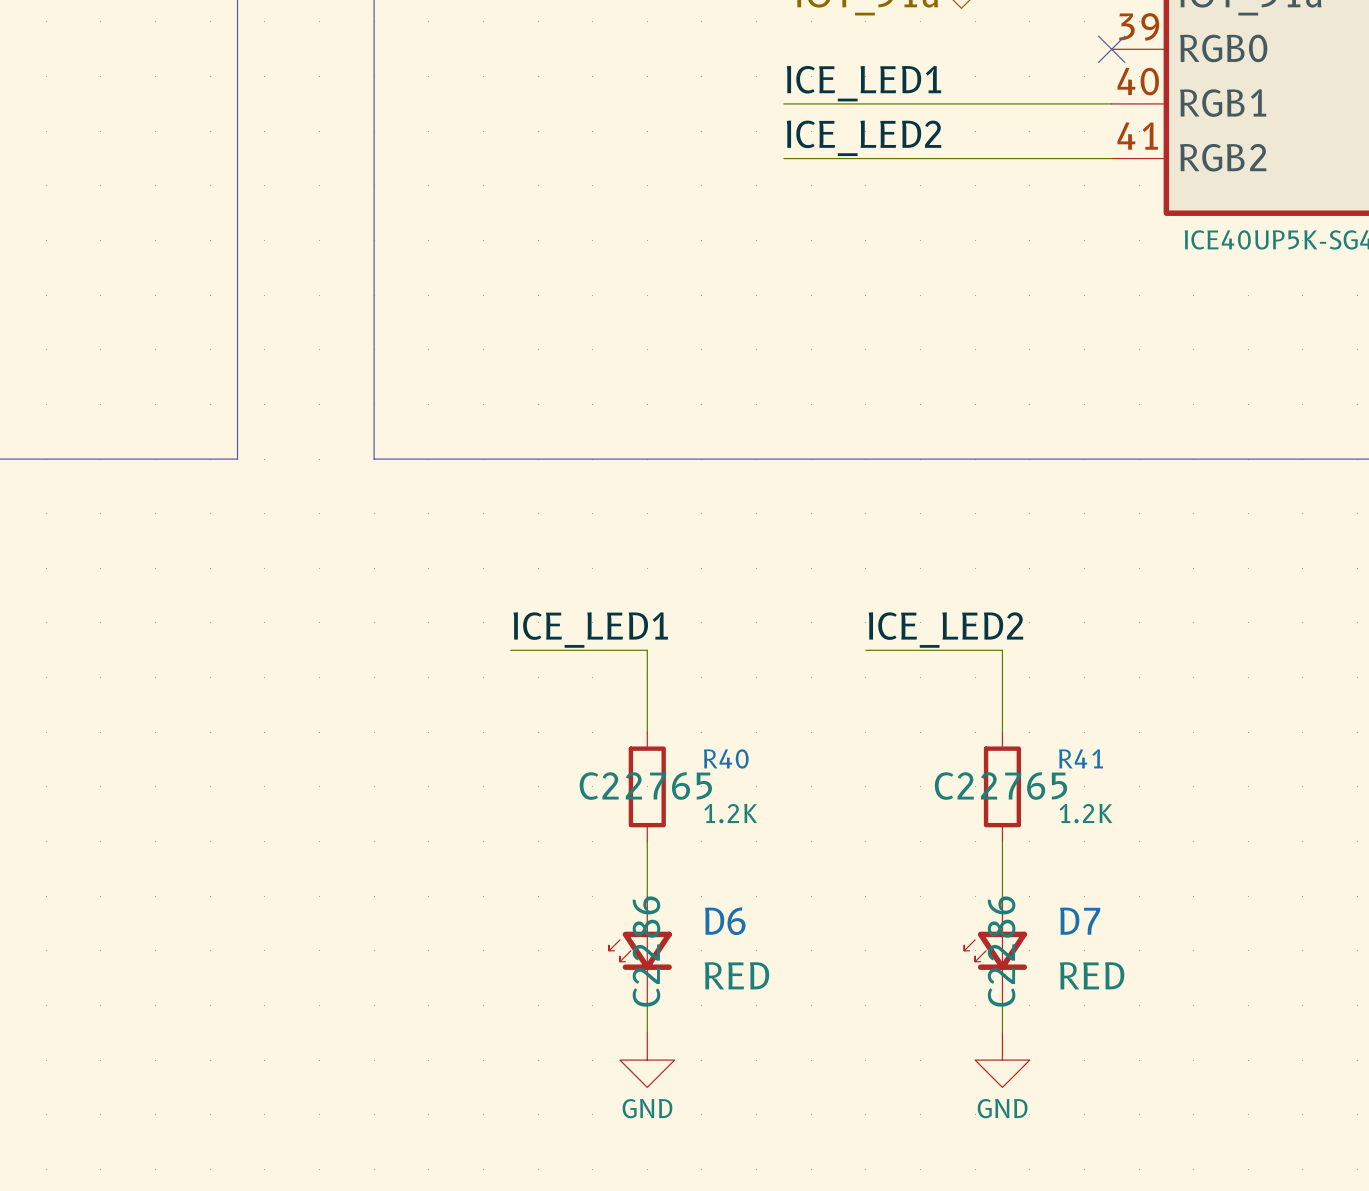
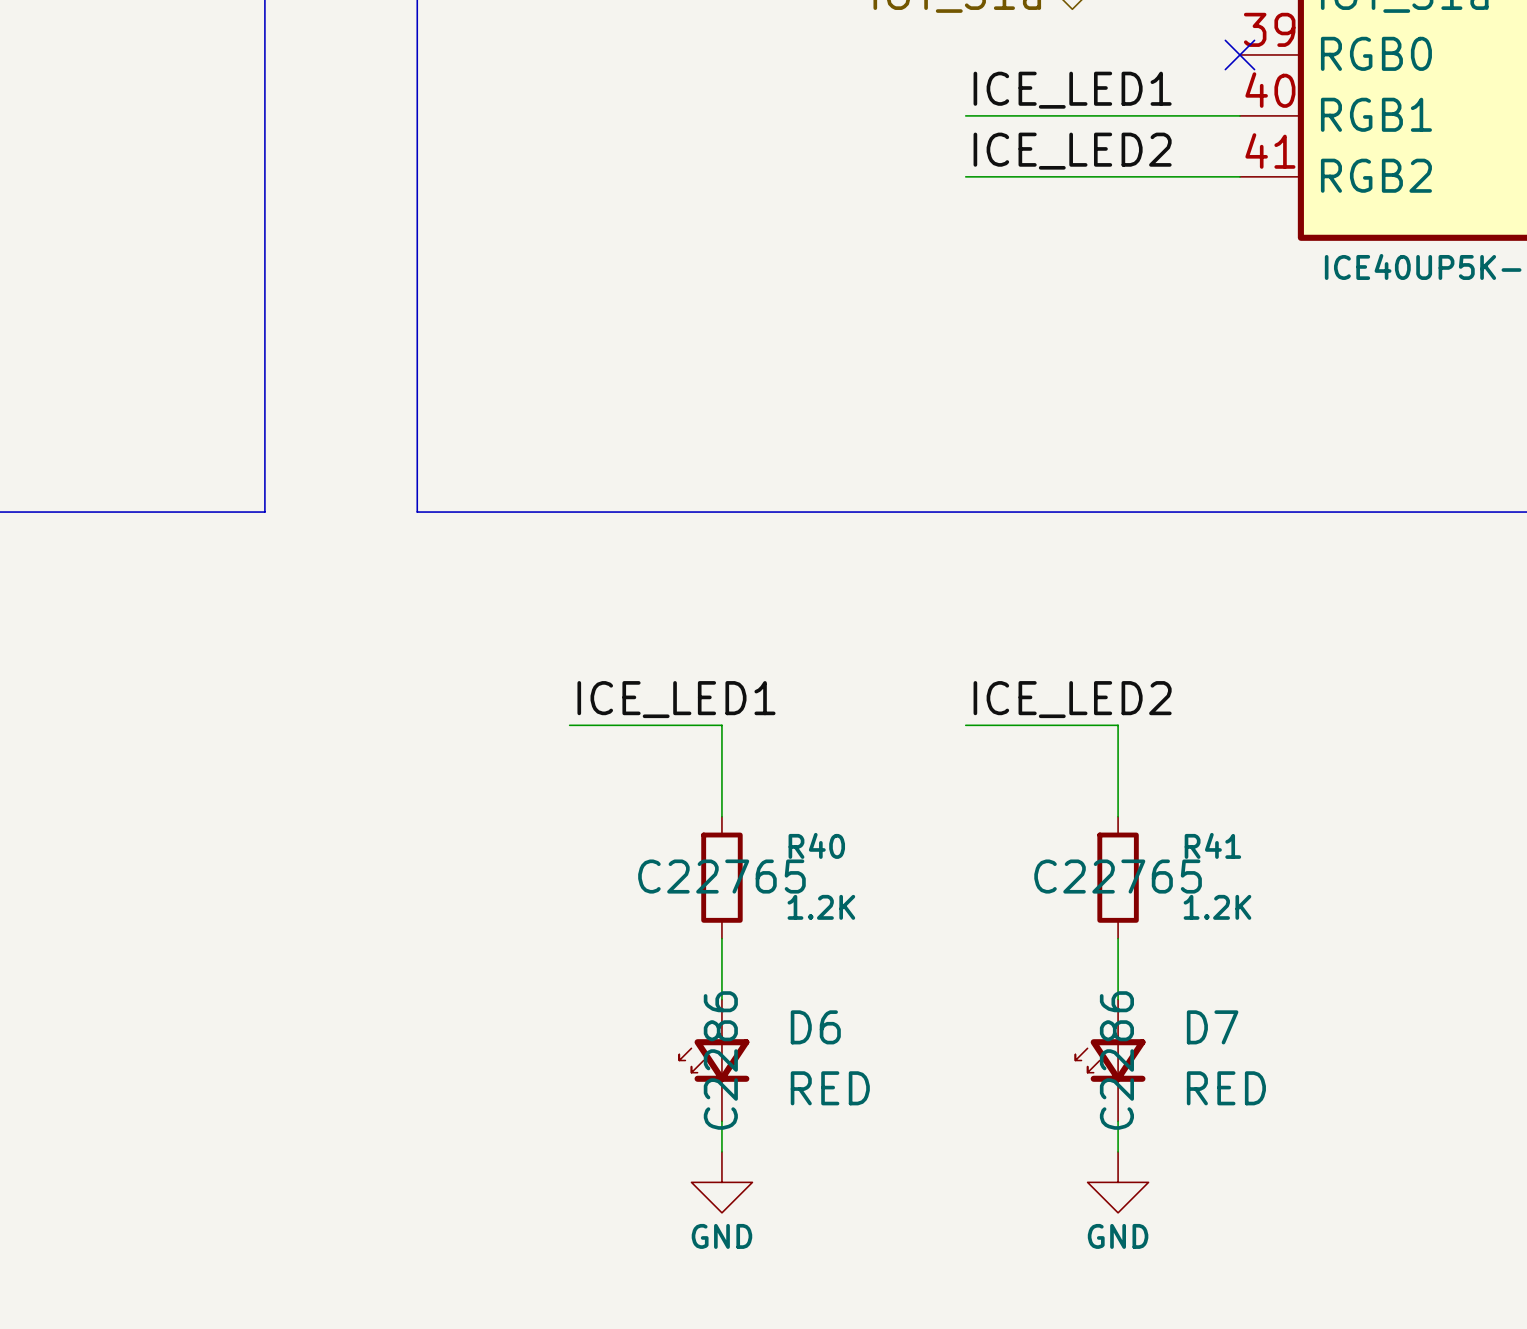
label position: ICE_LED1 (863, 83) -> ICE_LED1 (1072, 90)
wire: (783, 103) (865, 103) -> none
label position: ICE_LED2 (864, 138) -> ICE_LED2 (1072, 151)
wire: (783, 158) (865, 158) -> none

